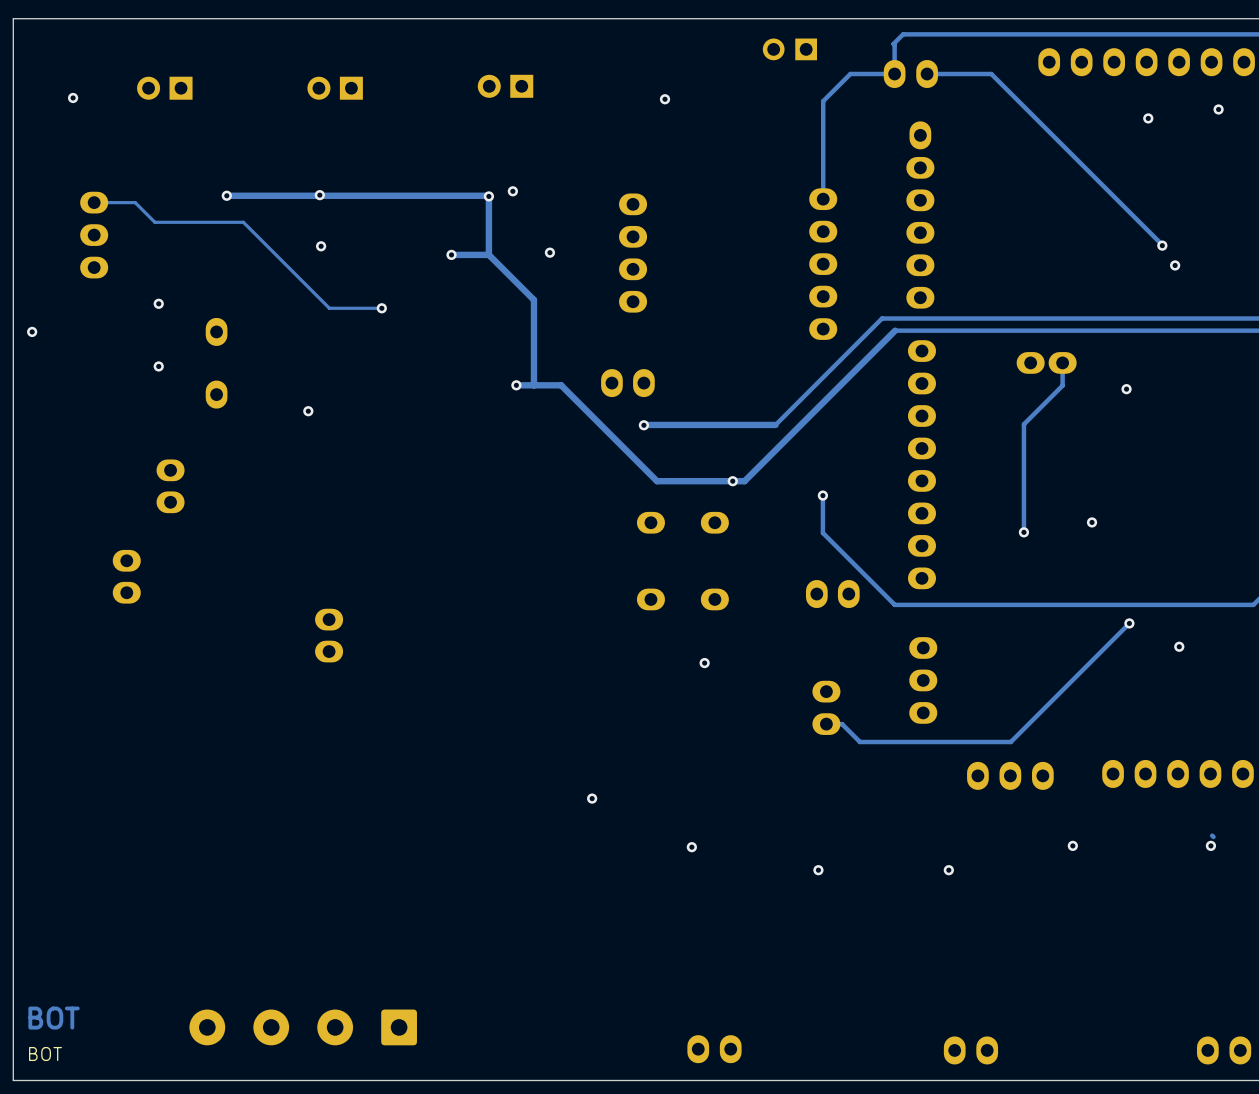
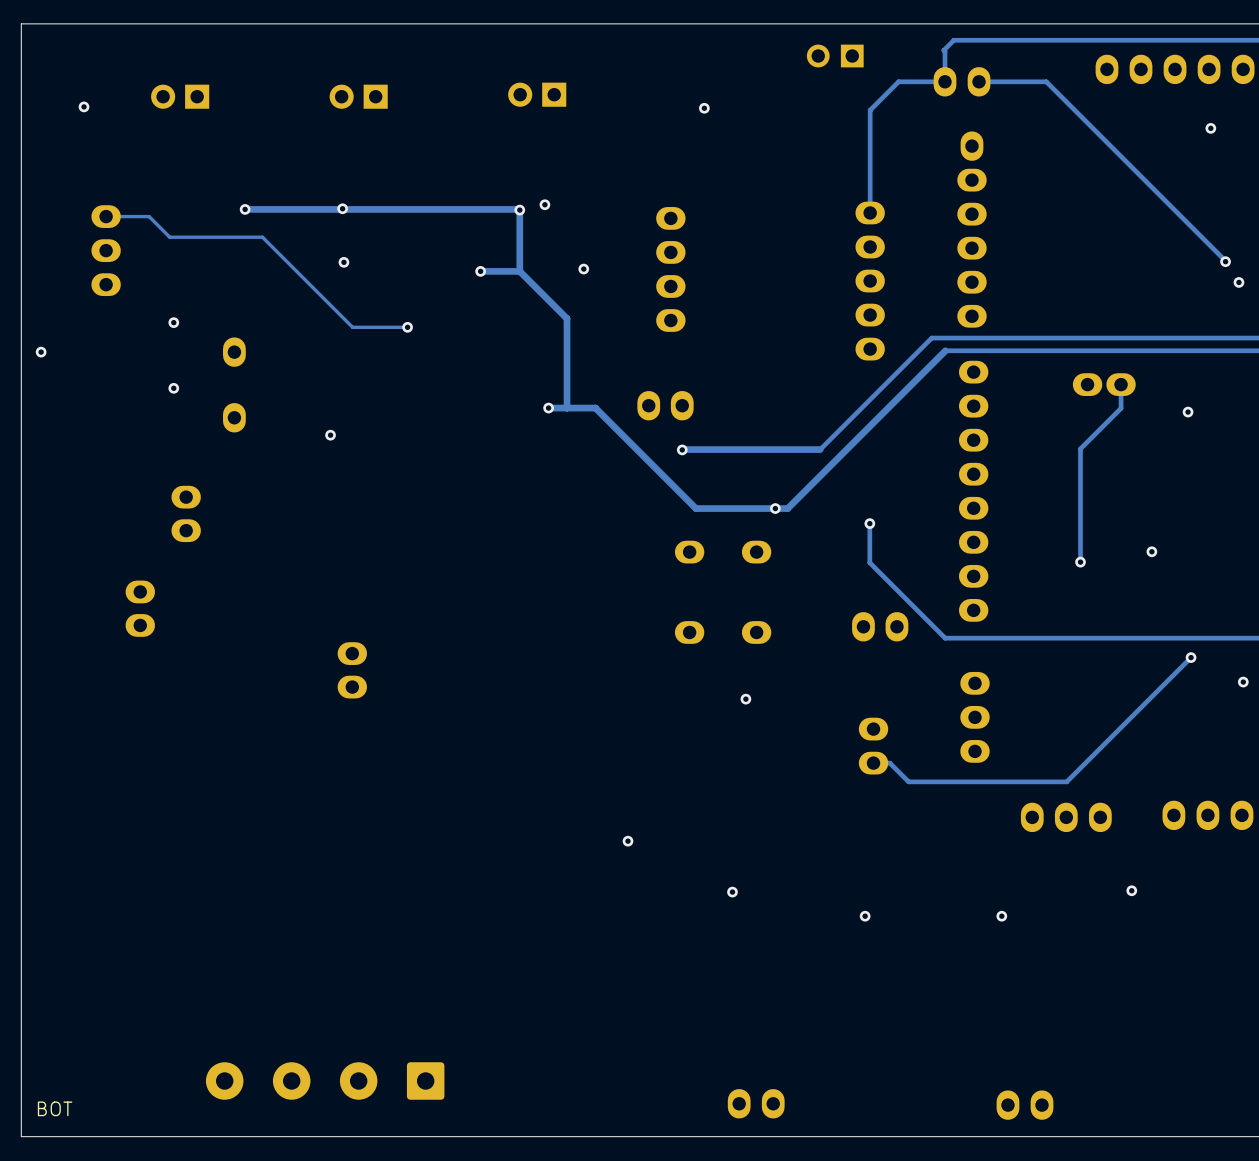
text: BOT (54, 1018) -> none

